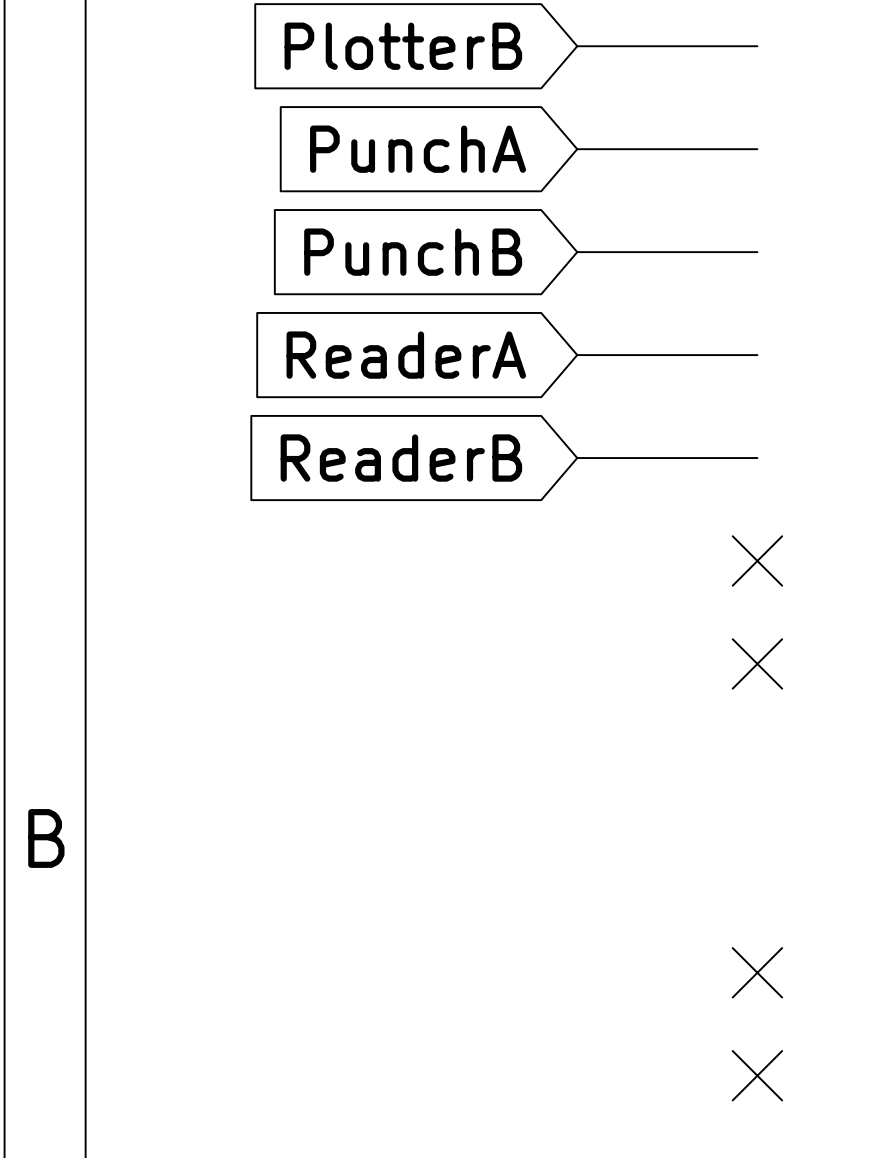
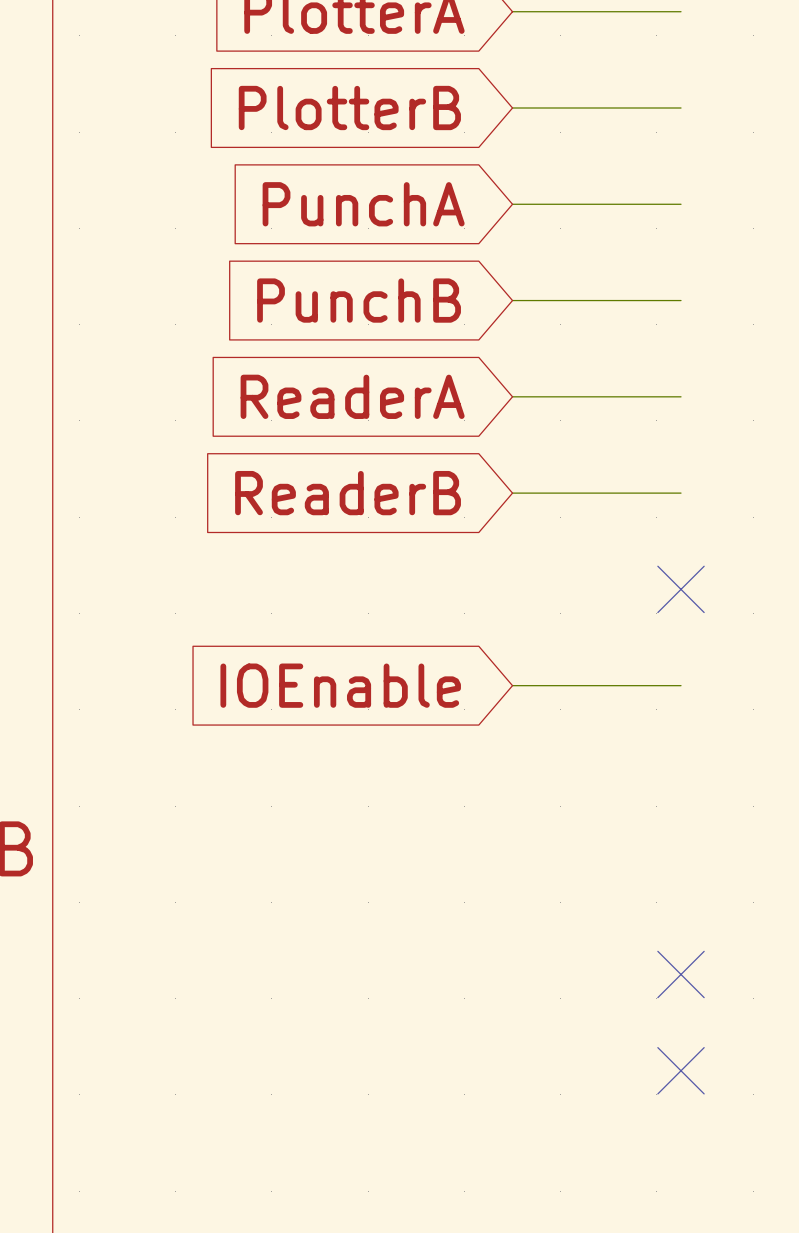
global label: none -> IOEnable (340, 685)
wire: none -> (512, 685) (681, 685)
no-connect mark: (757, 663) -> none

